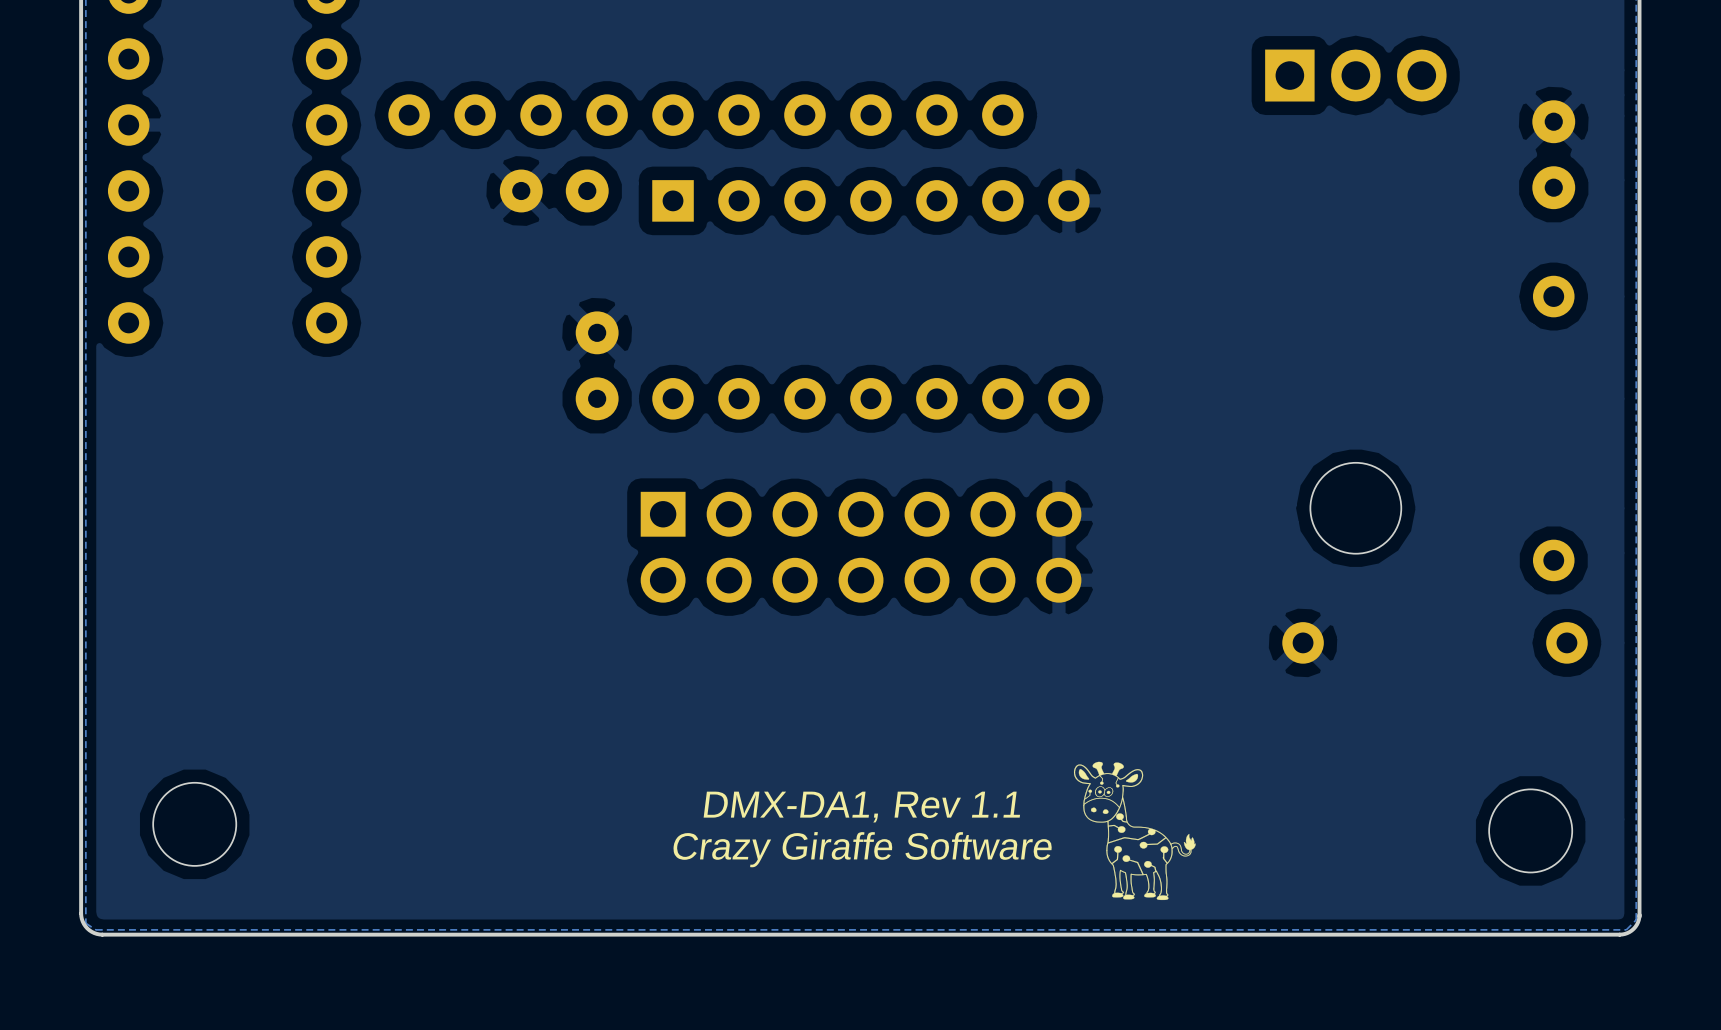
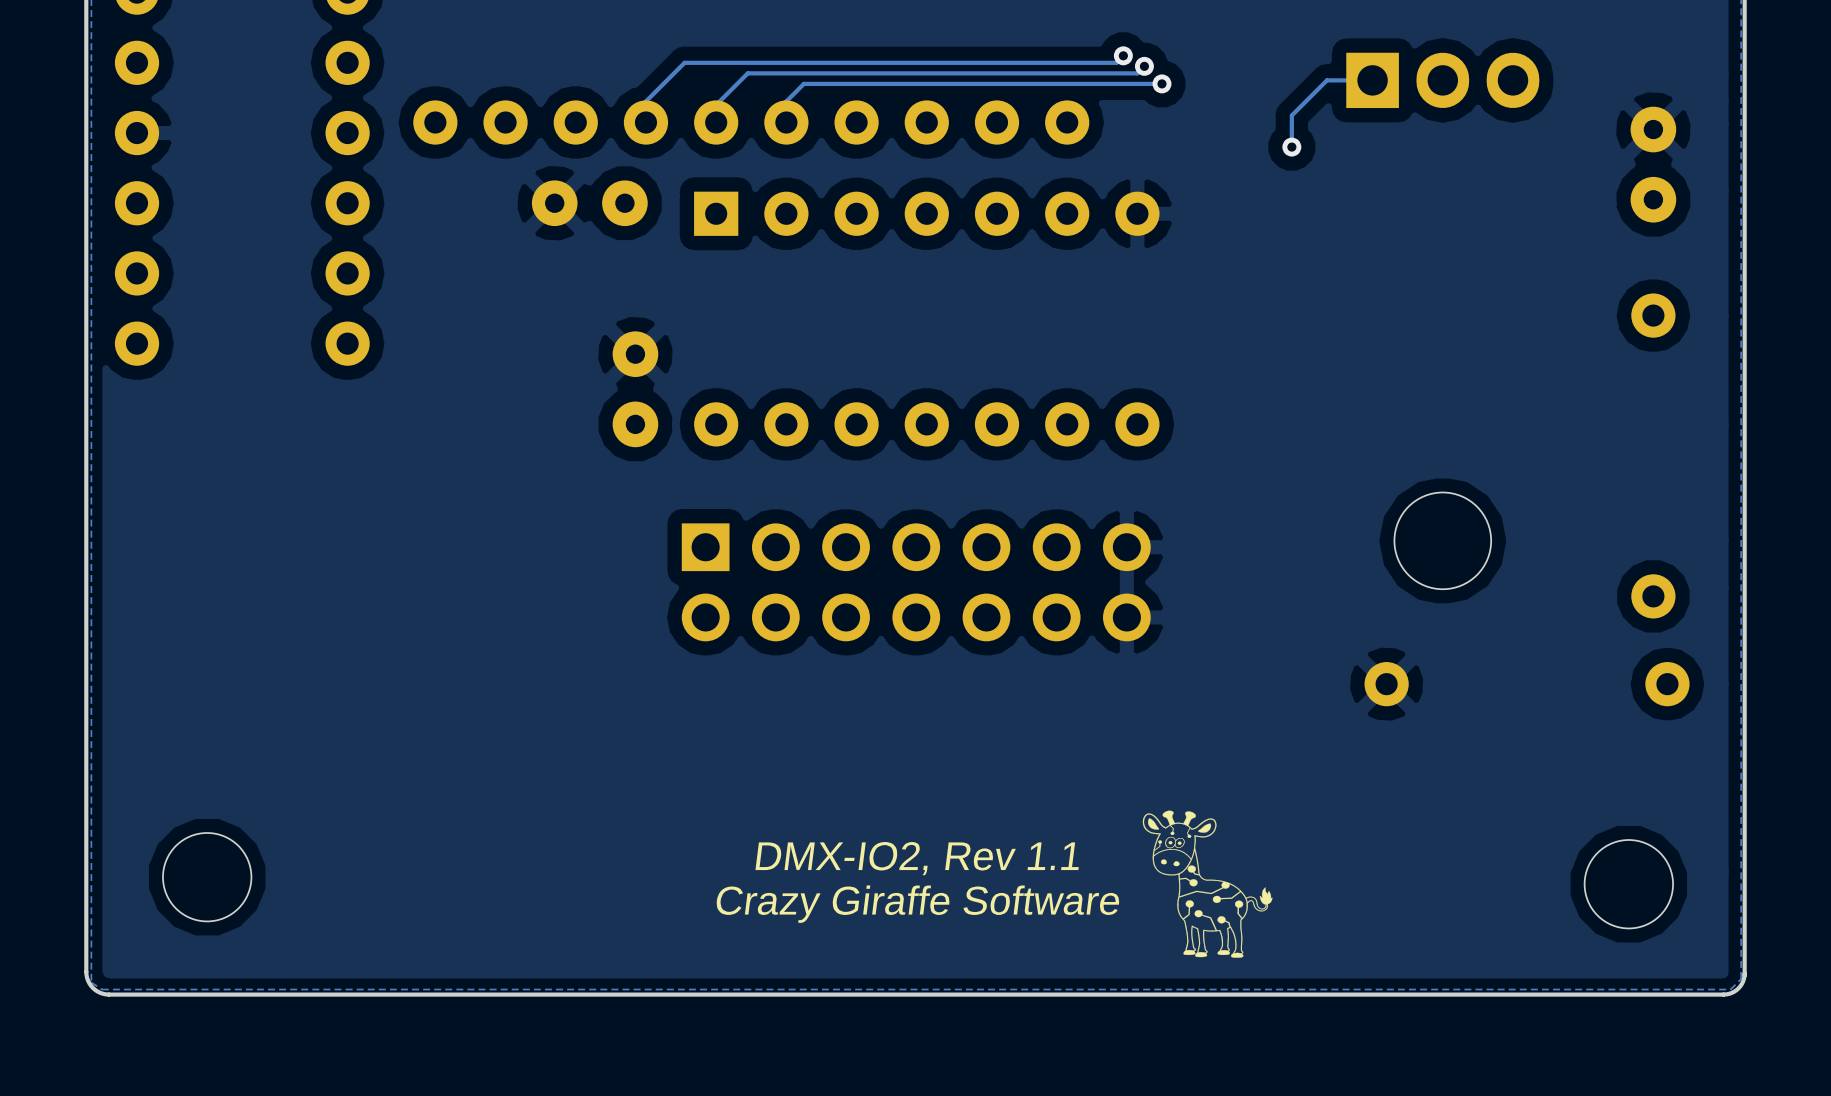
track: none -> (1123, 55) (1116, 62) (684, 62) (645, 101) (645, 122)
via: none -> (1123, 55)
track: none -> (1144, 66) (1137, 73) (747, 73) (716, 104) (716, 122)
via: none -> (1144, 66)
track: none -> (1372, 80) (1326, 80) (1291, 115) (1291, 147)
track: none -> (1161, 83) (803, 83) (786, 101) (786, 122)
via: none -> (1161, 83)
via: none -> (1291, 147)
text: DMX-DA1, Rev 1.1 (861, 807) -> DMX-IO2, Rev 1.1 (917, 858)

